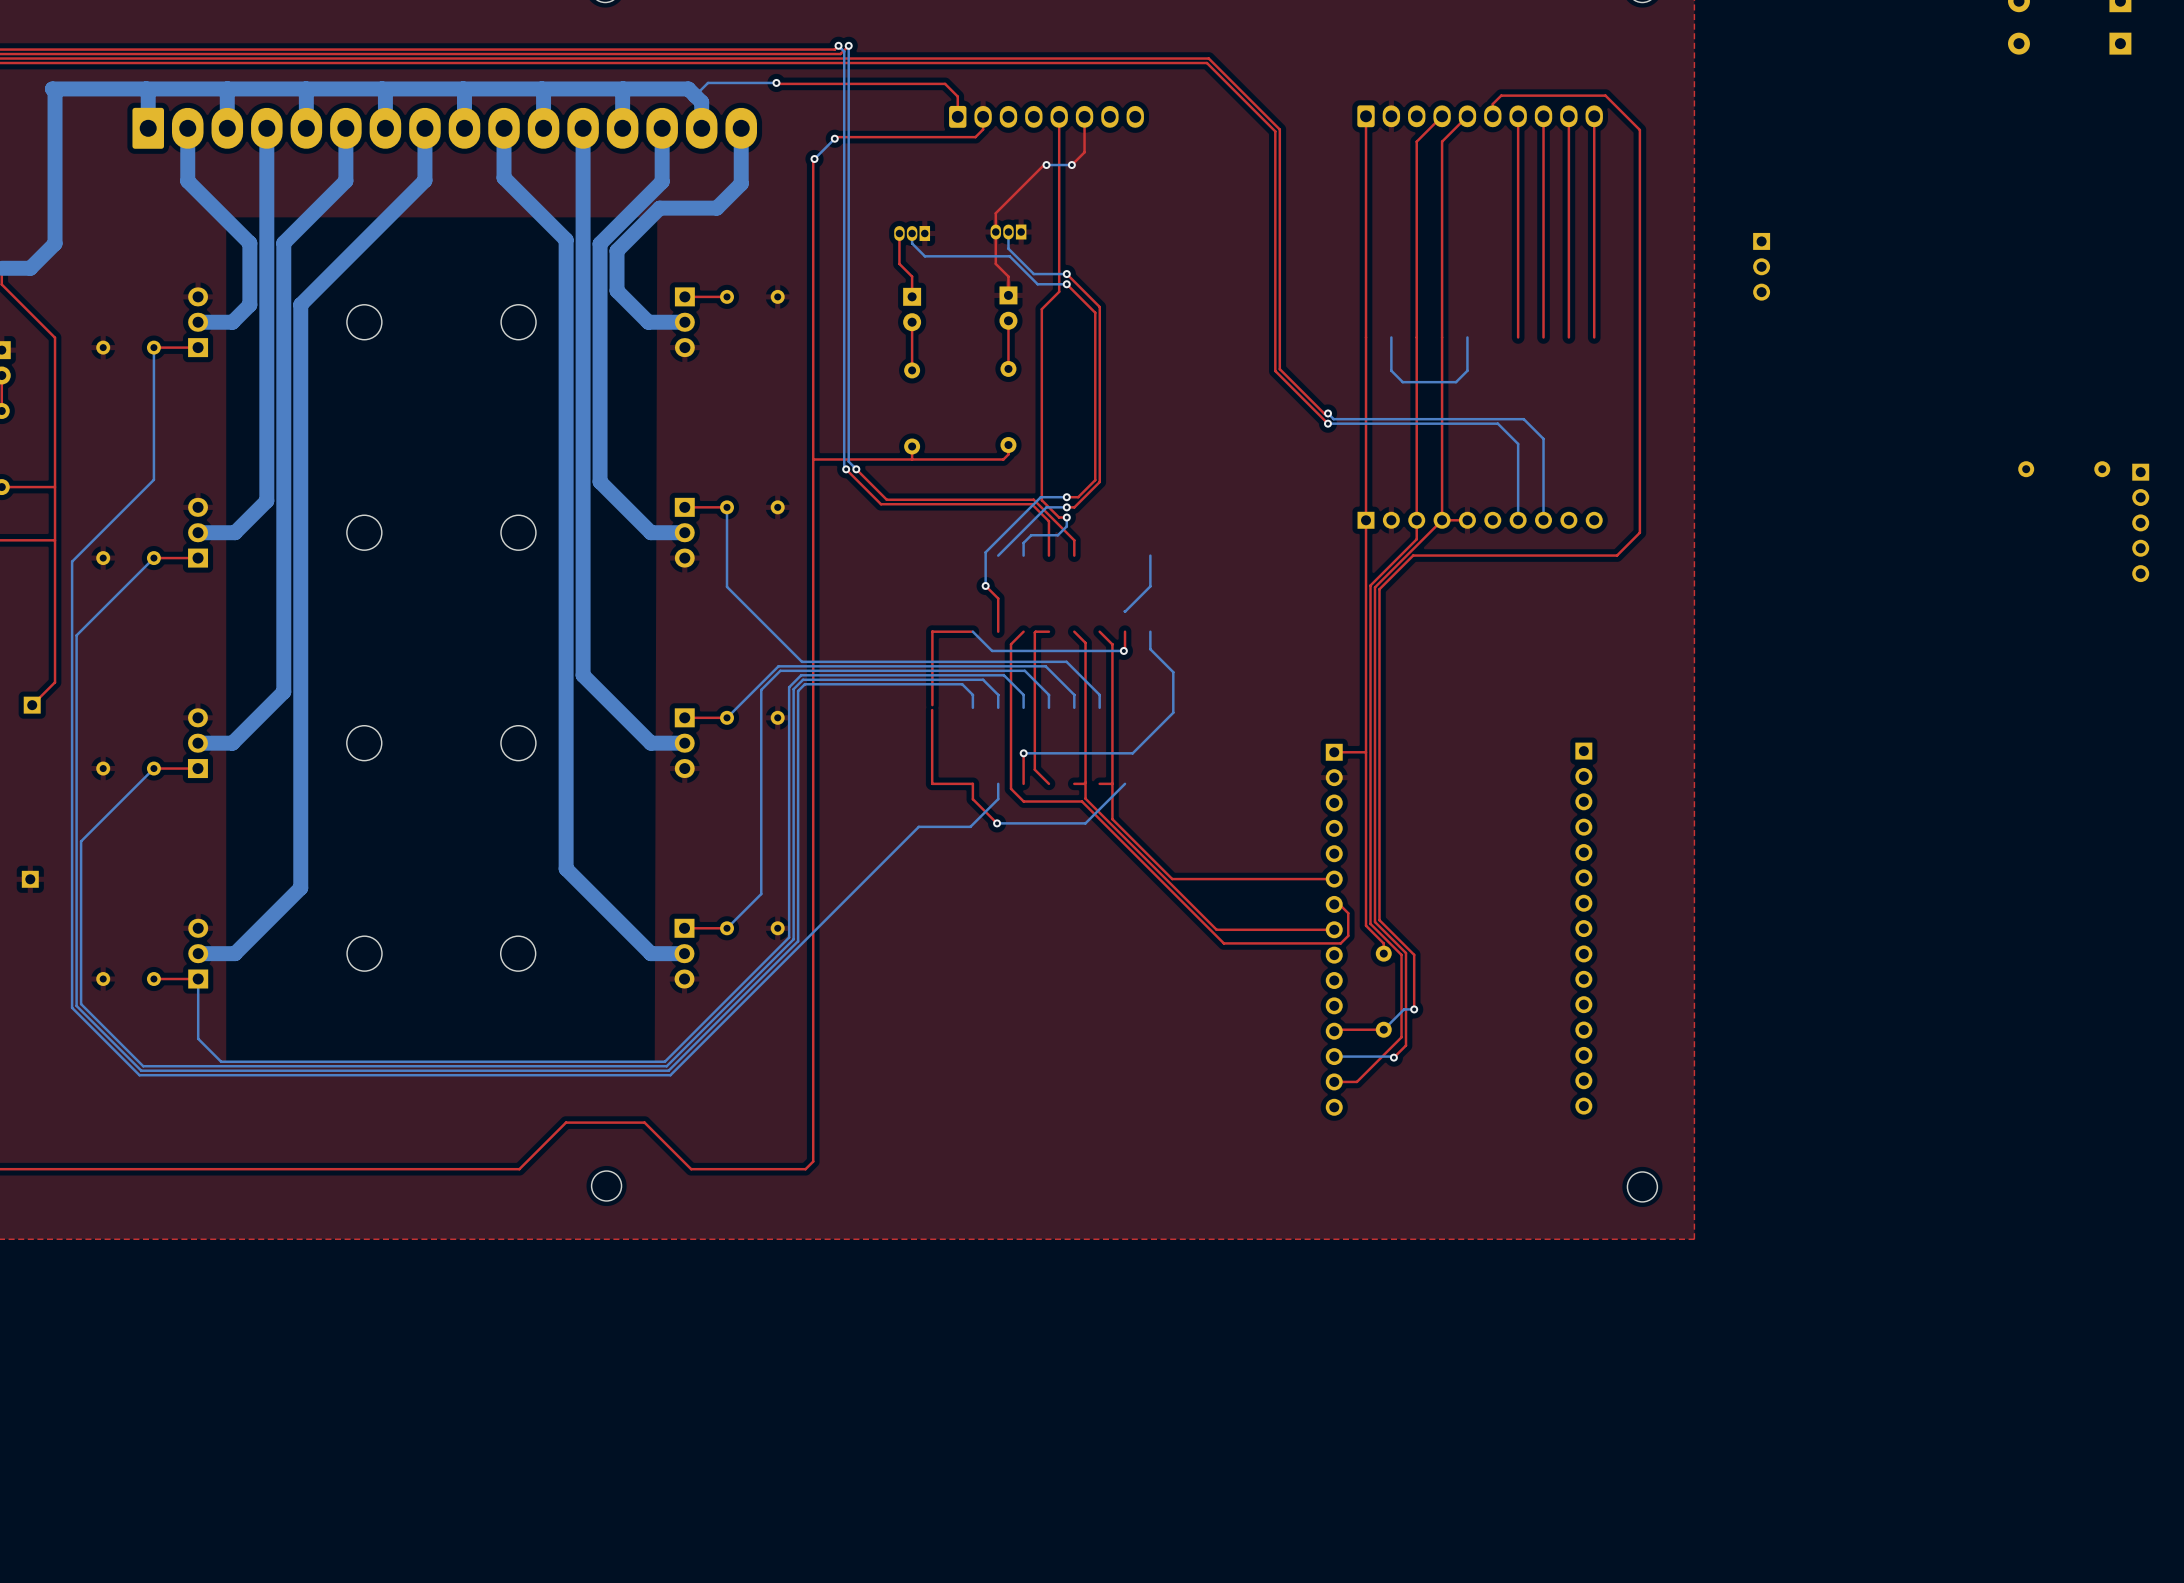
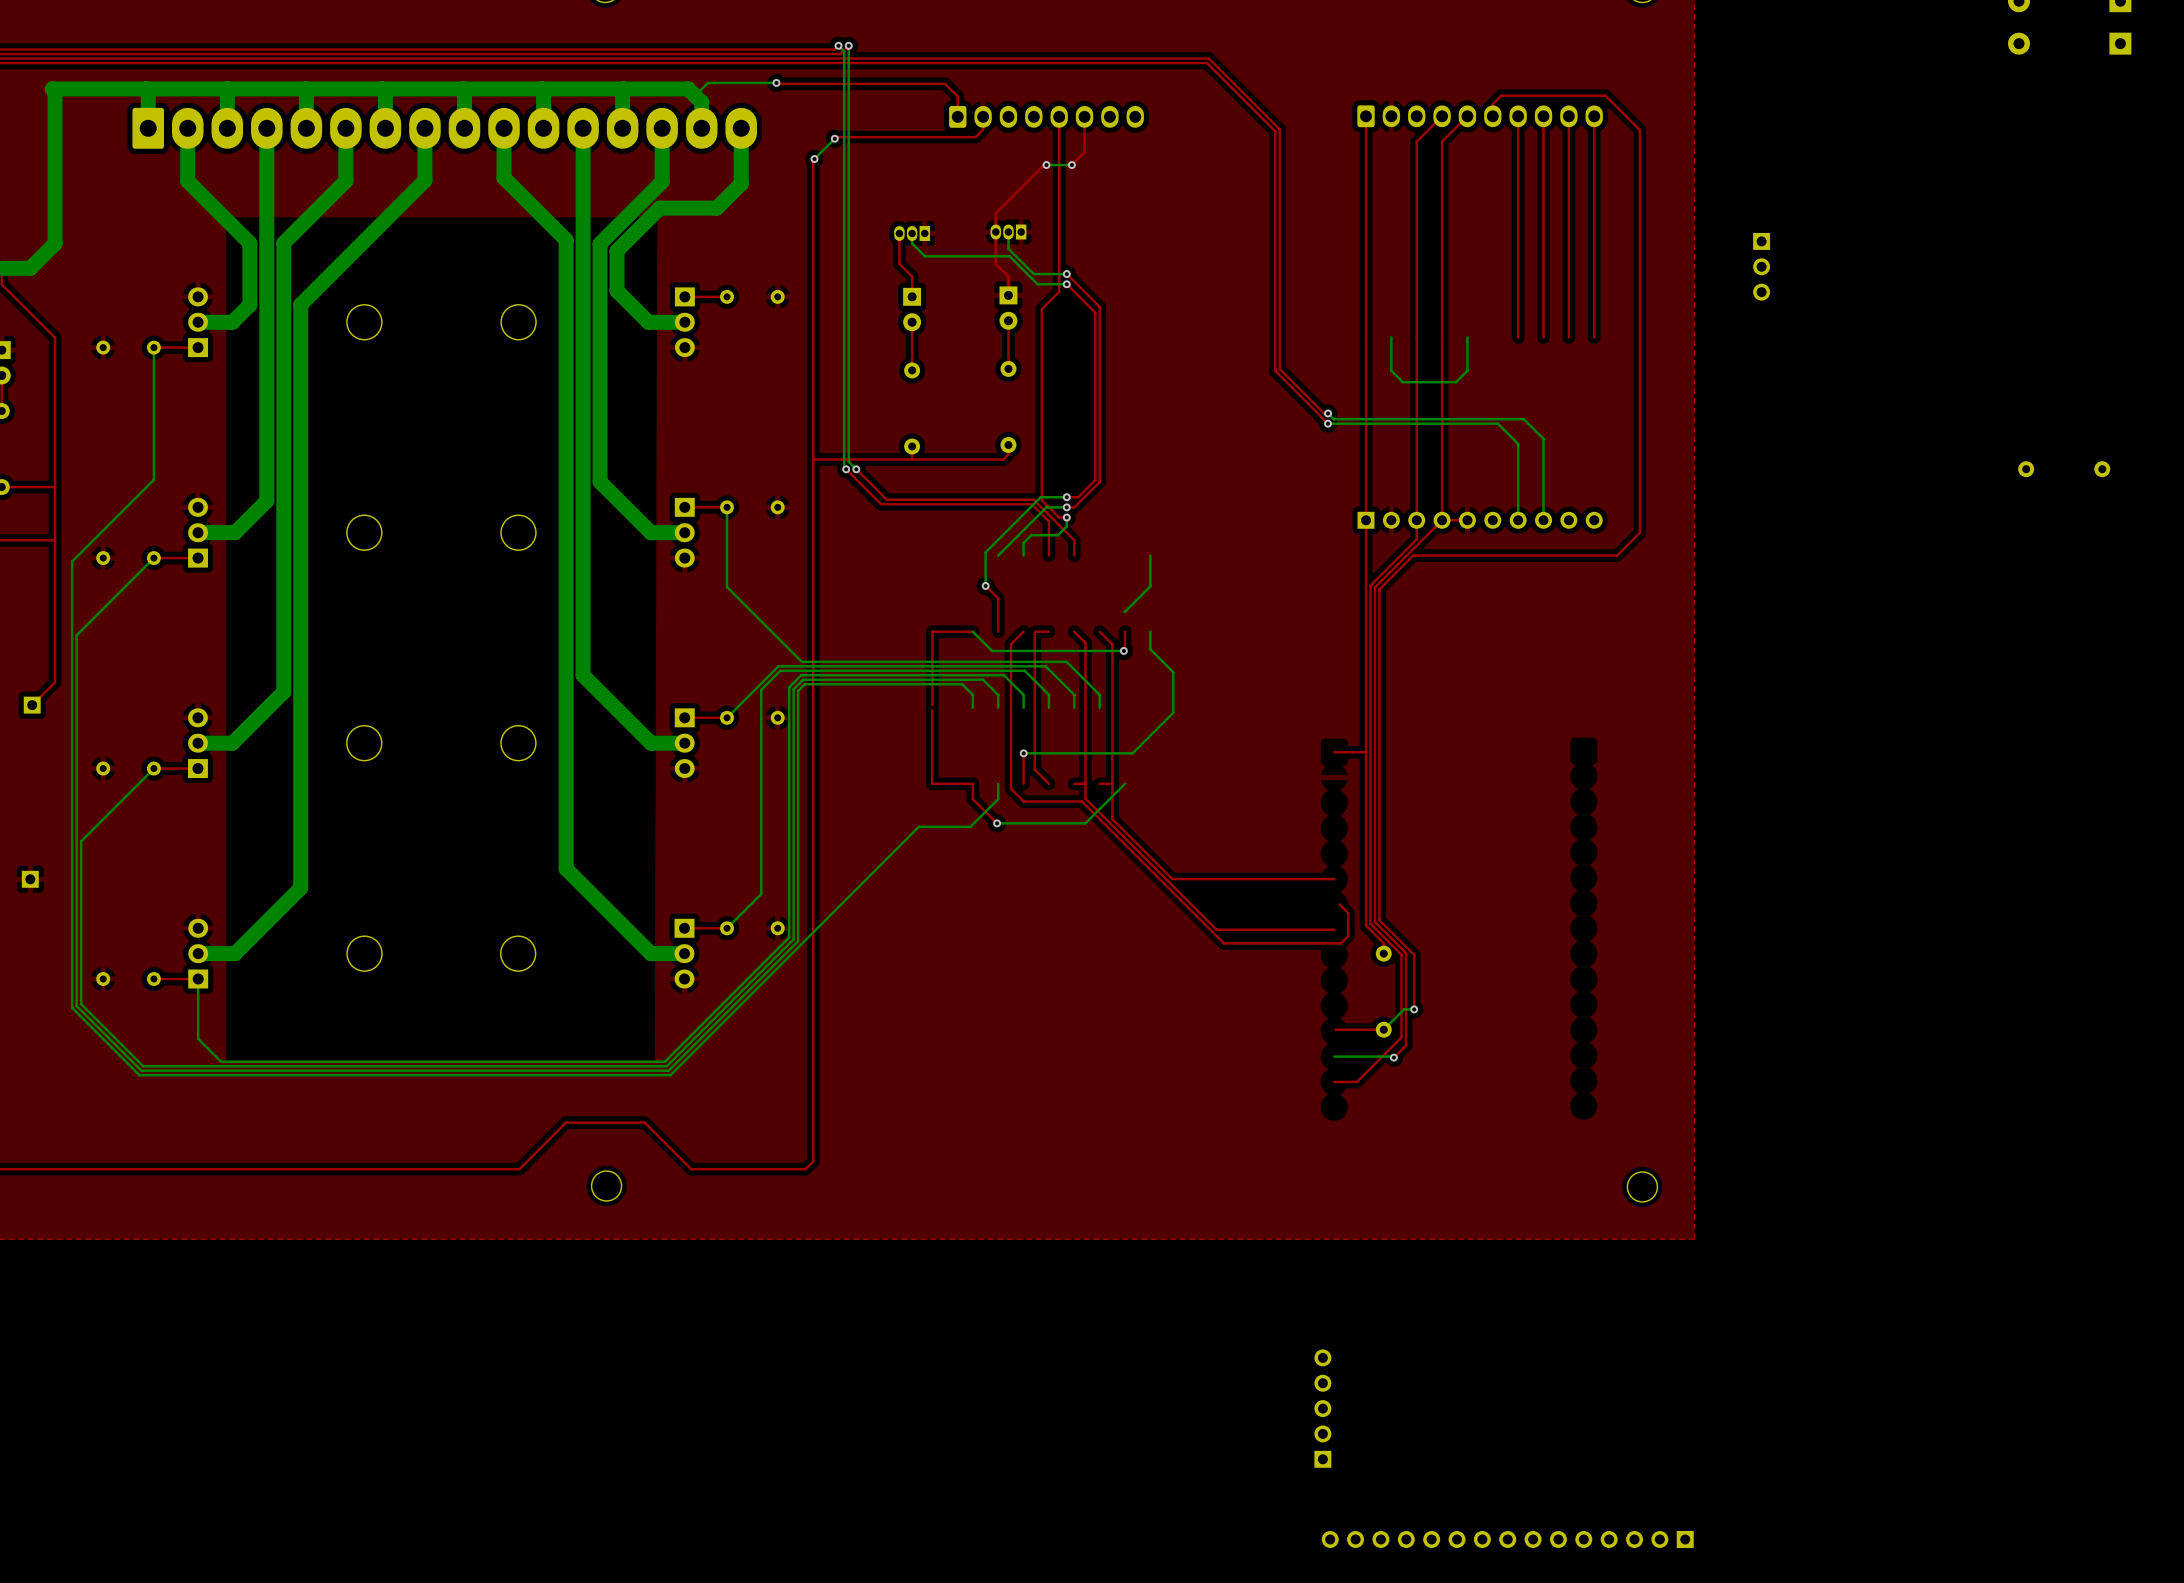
part: (2140, 522) -> none
part: (1583, 928) -> none
part: (1334, 929) -> none
part: none -> (1322, 1408)
part: none -> (1507, 1539)

